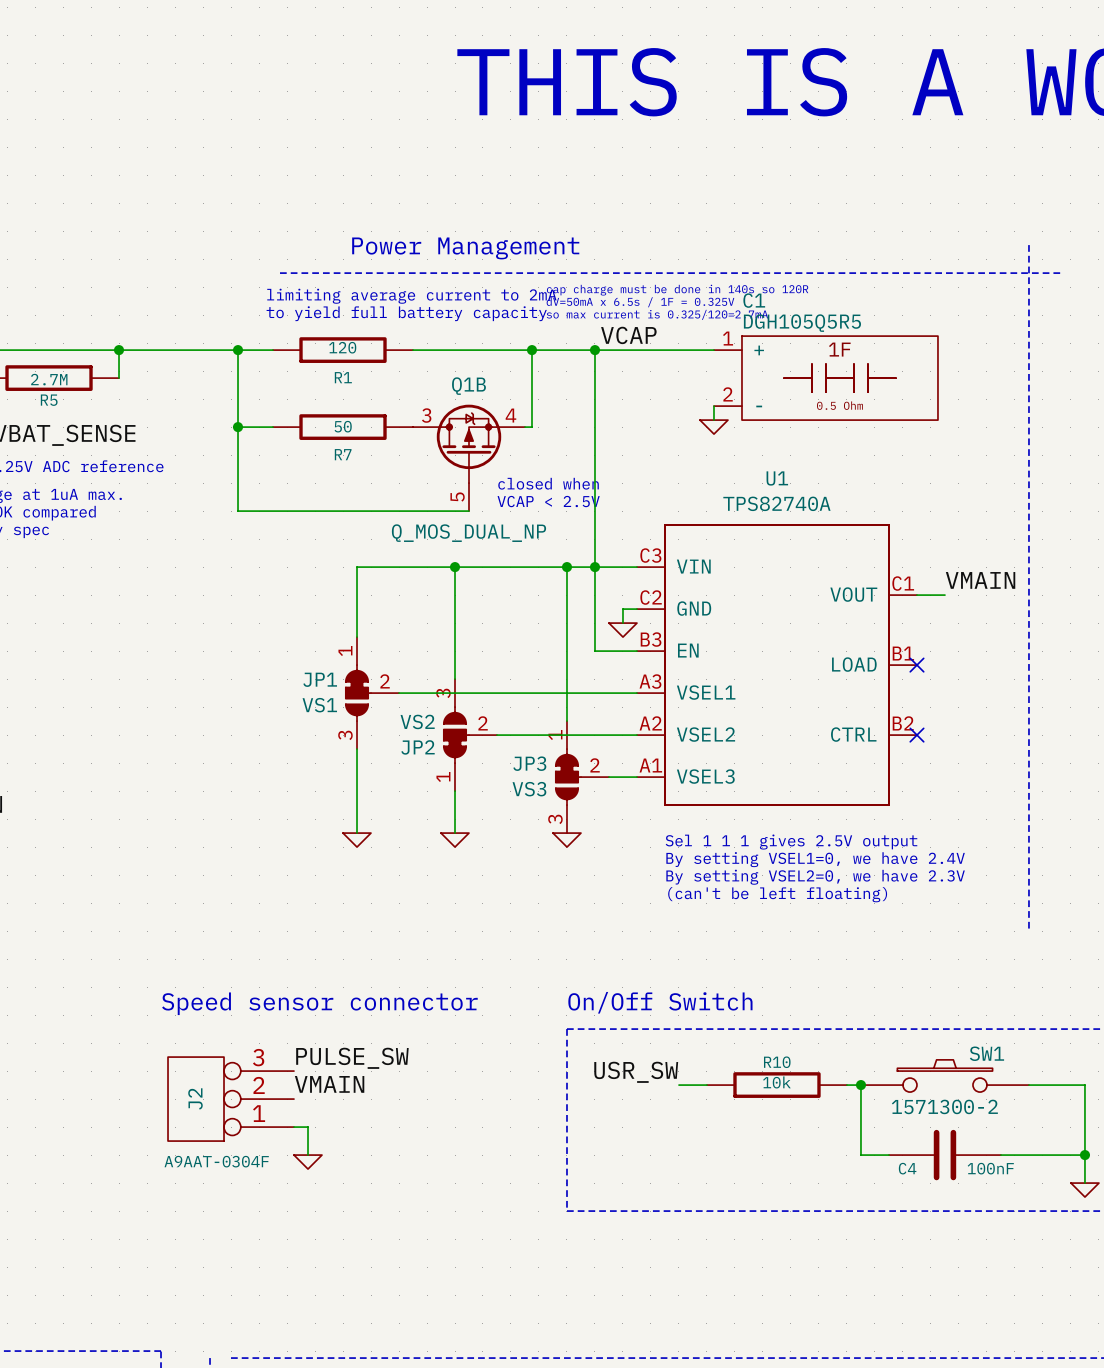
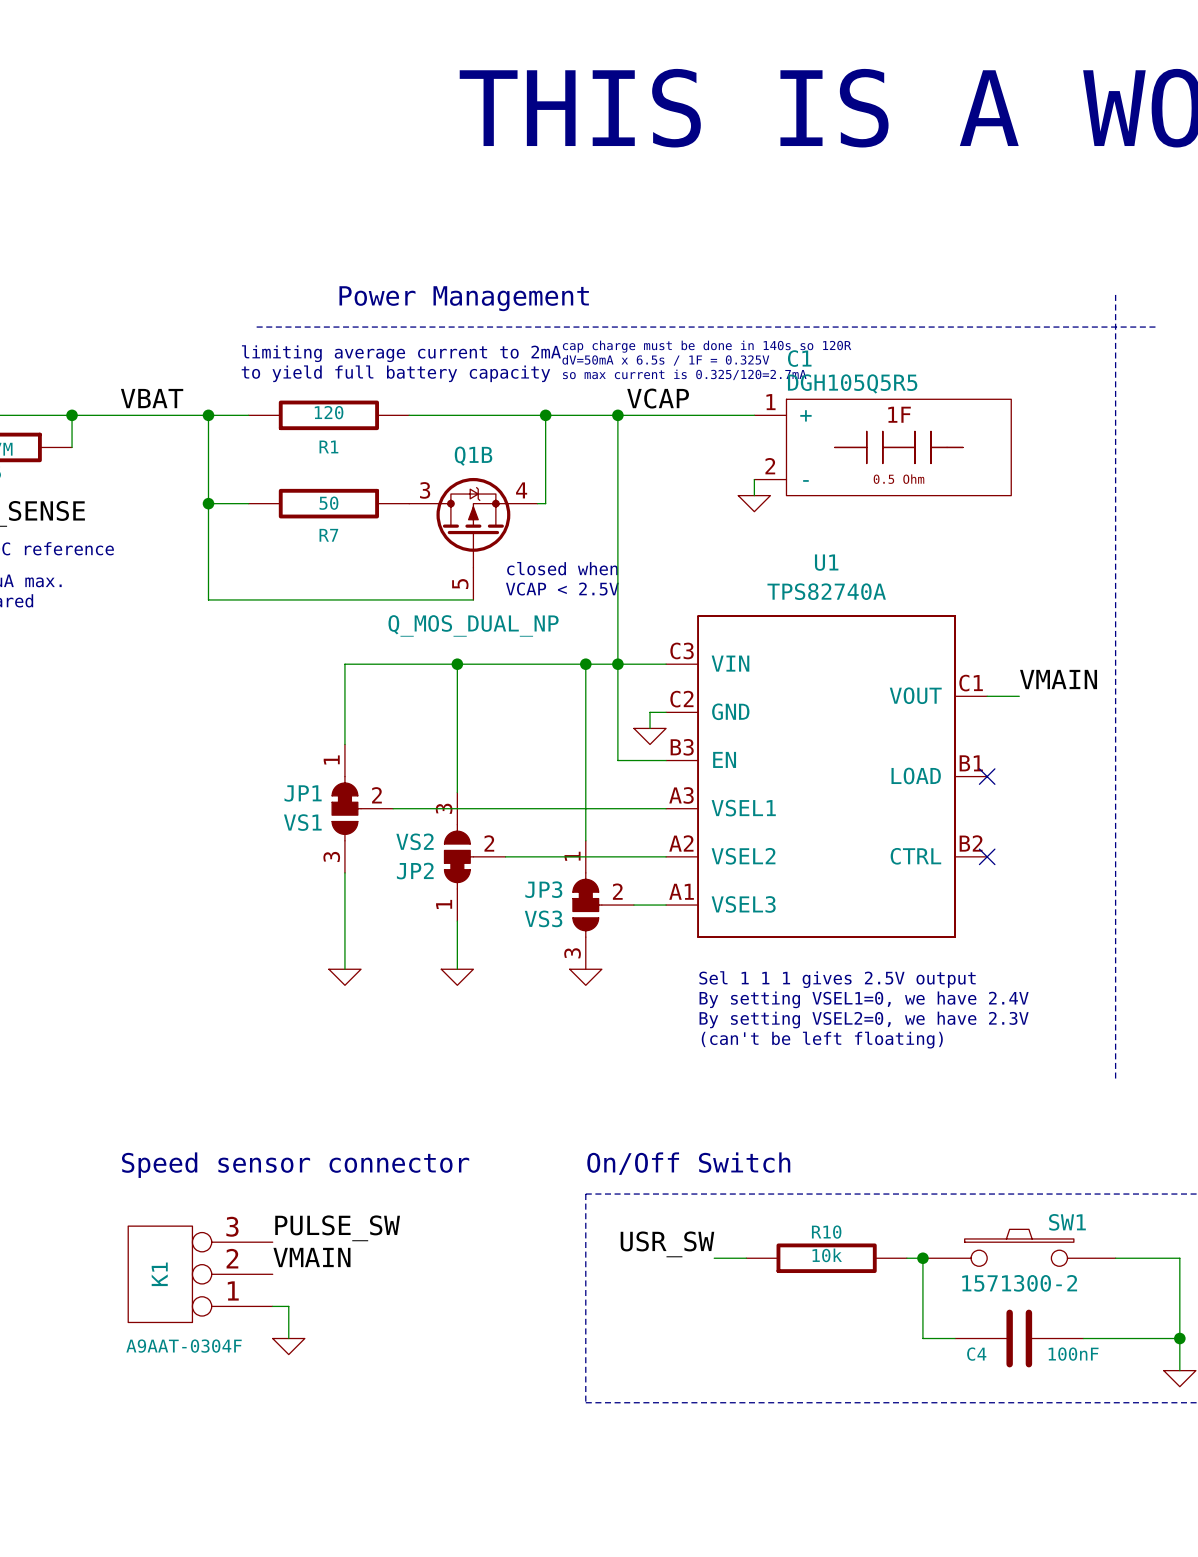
label: none -> VBAT (152, 398)
J2 name: J2 (195, 1098) -> K1 (159, 1274)

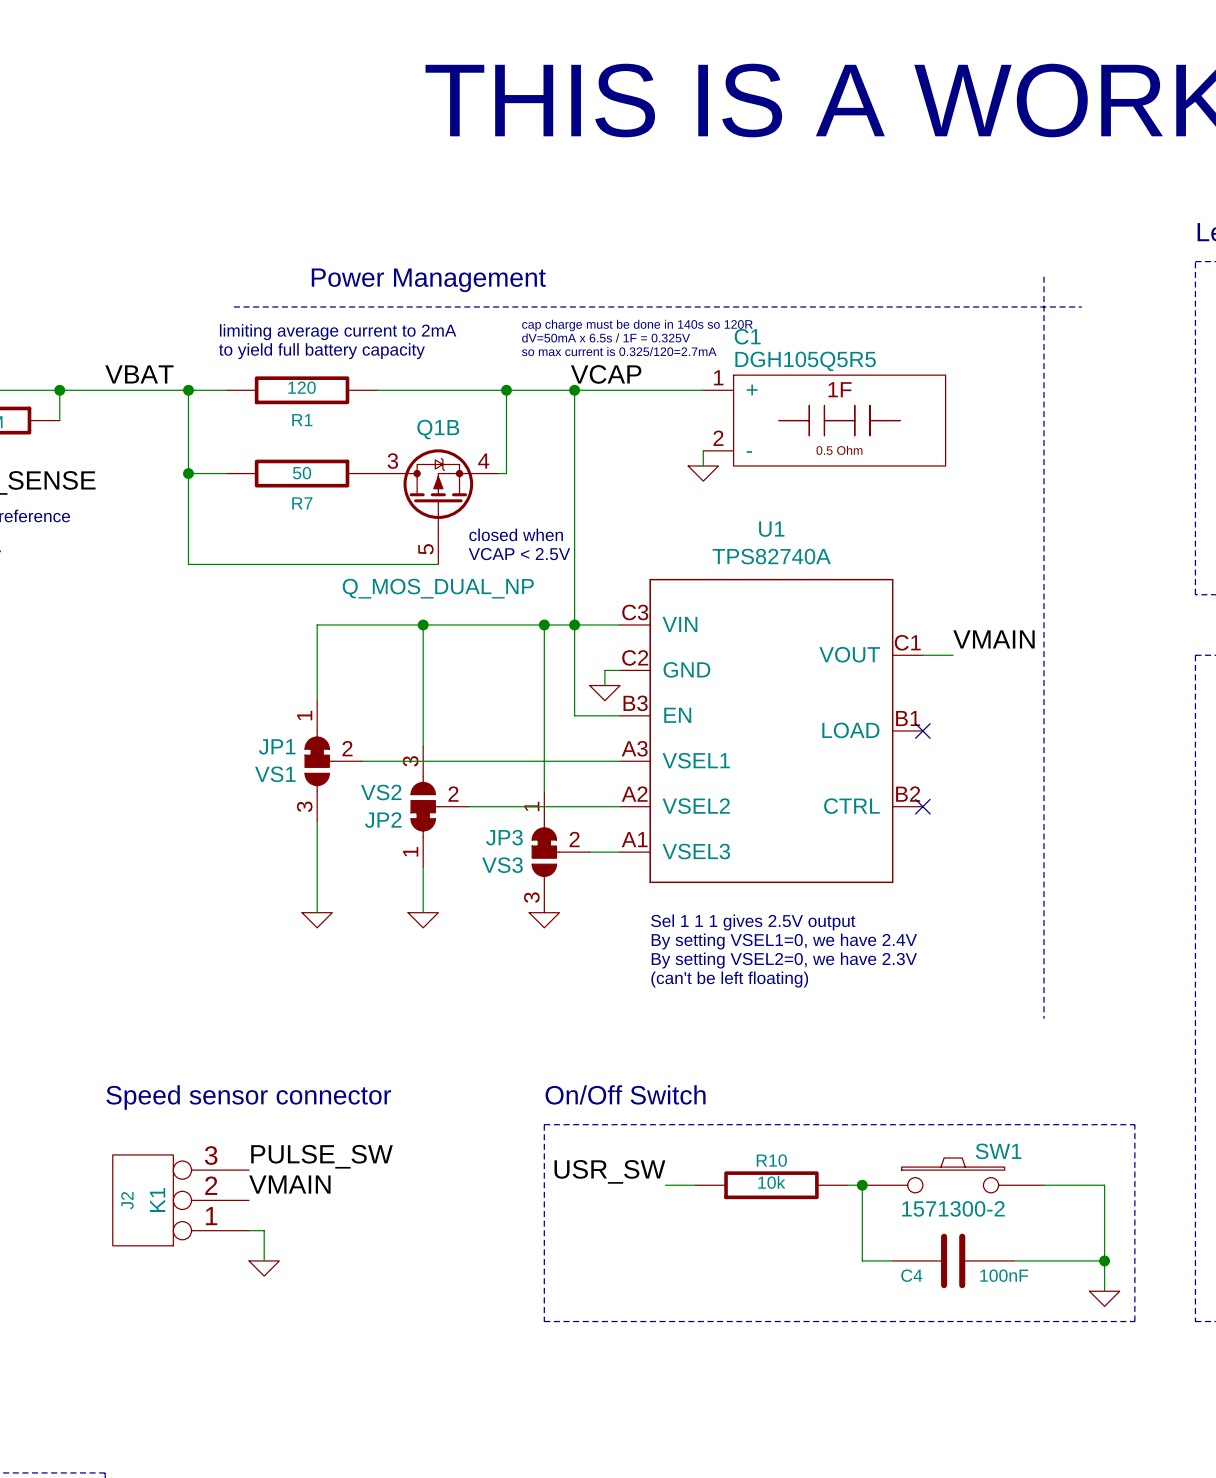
K1 name position: K1 (159, 1274) -> K1 (157, 1200)
K1 value: A9AAT-0304F (184, 1346) -> J2 (127, 1200)

